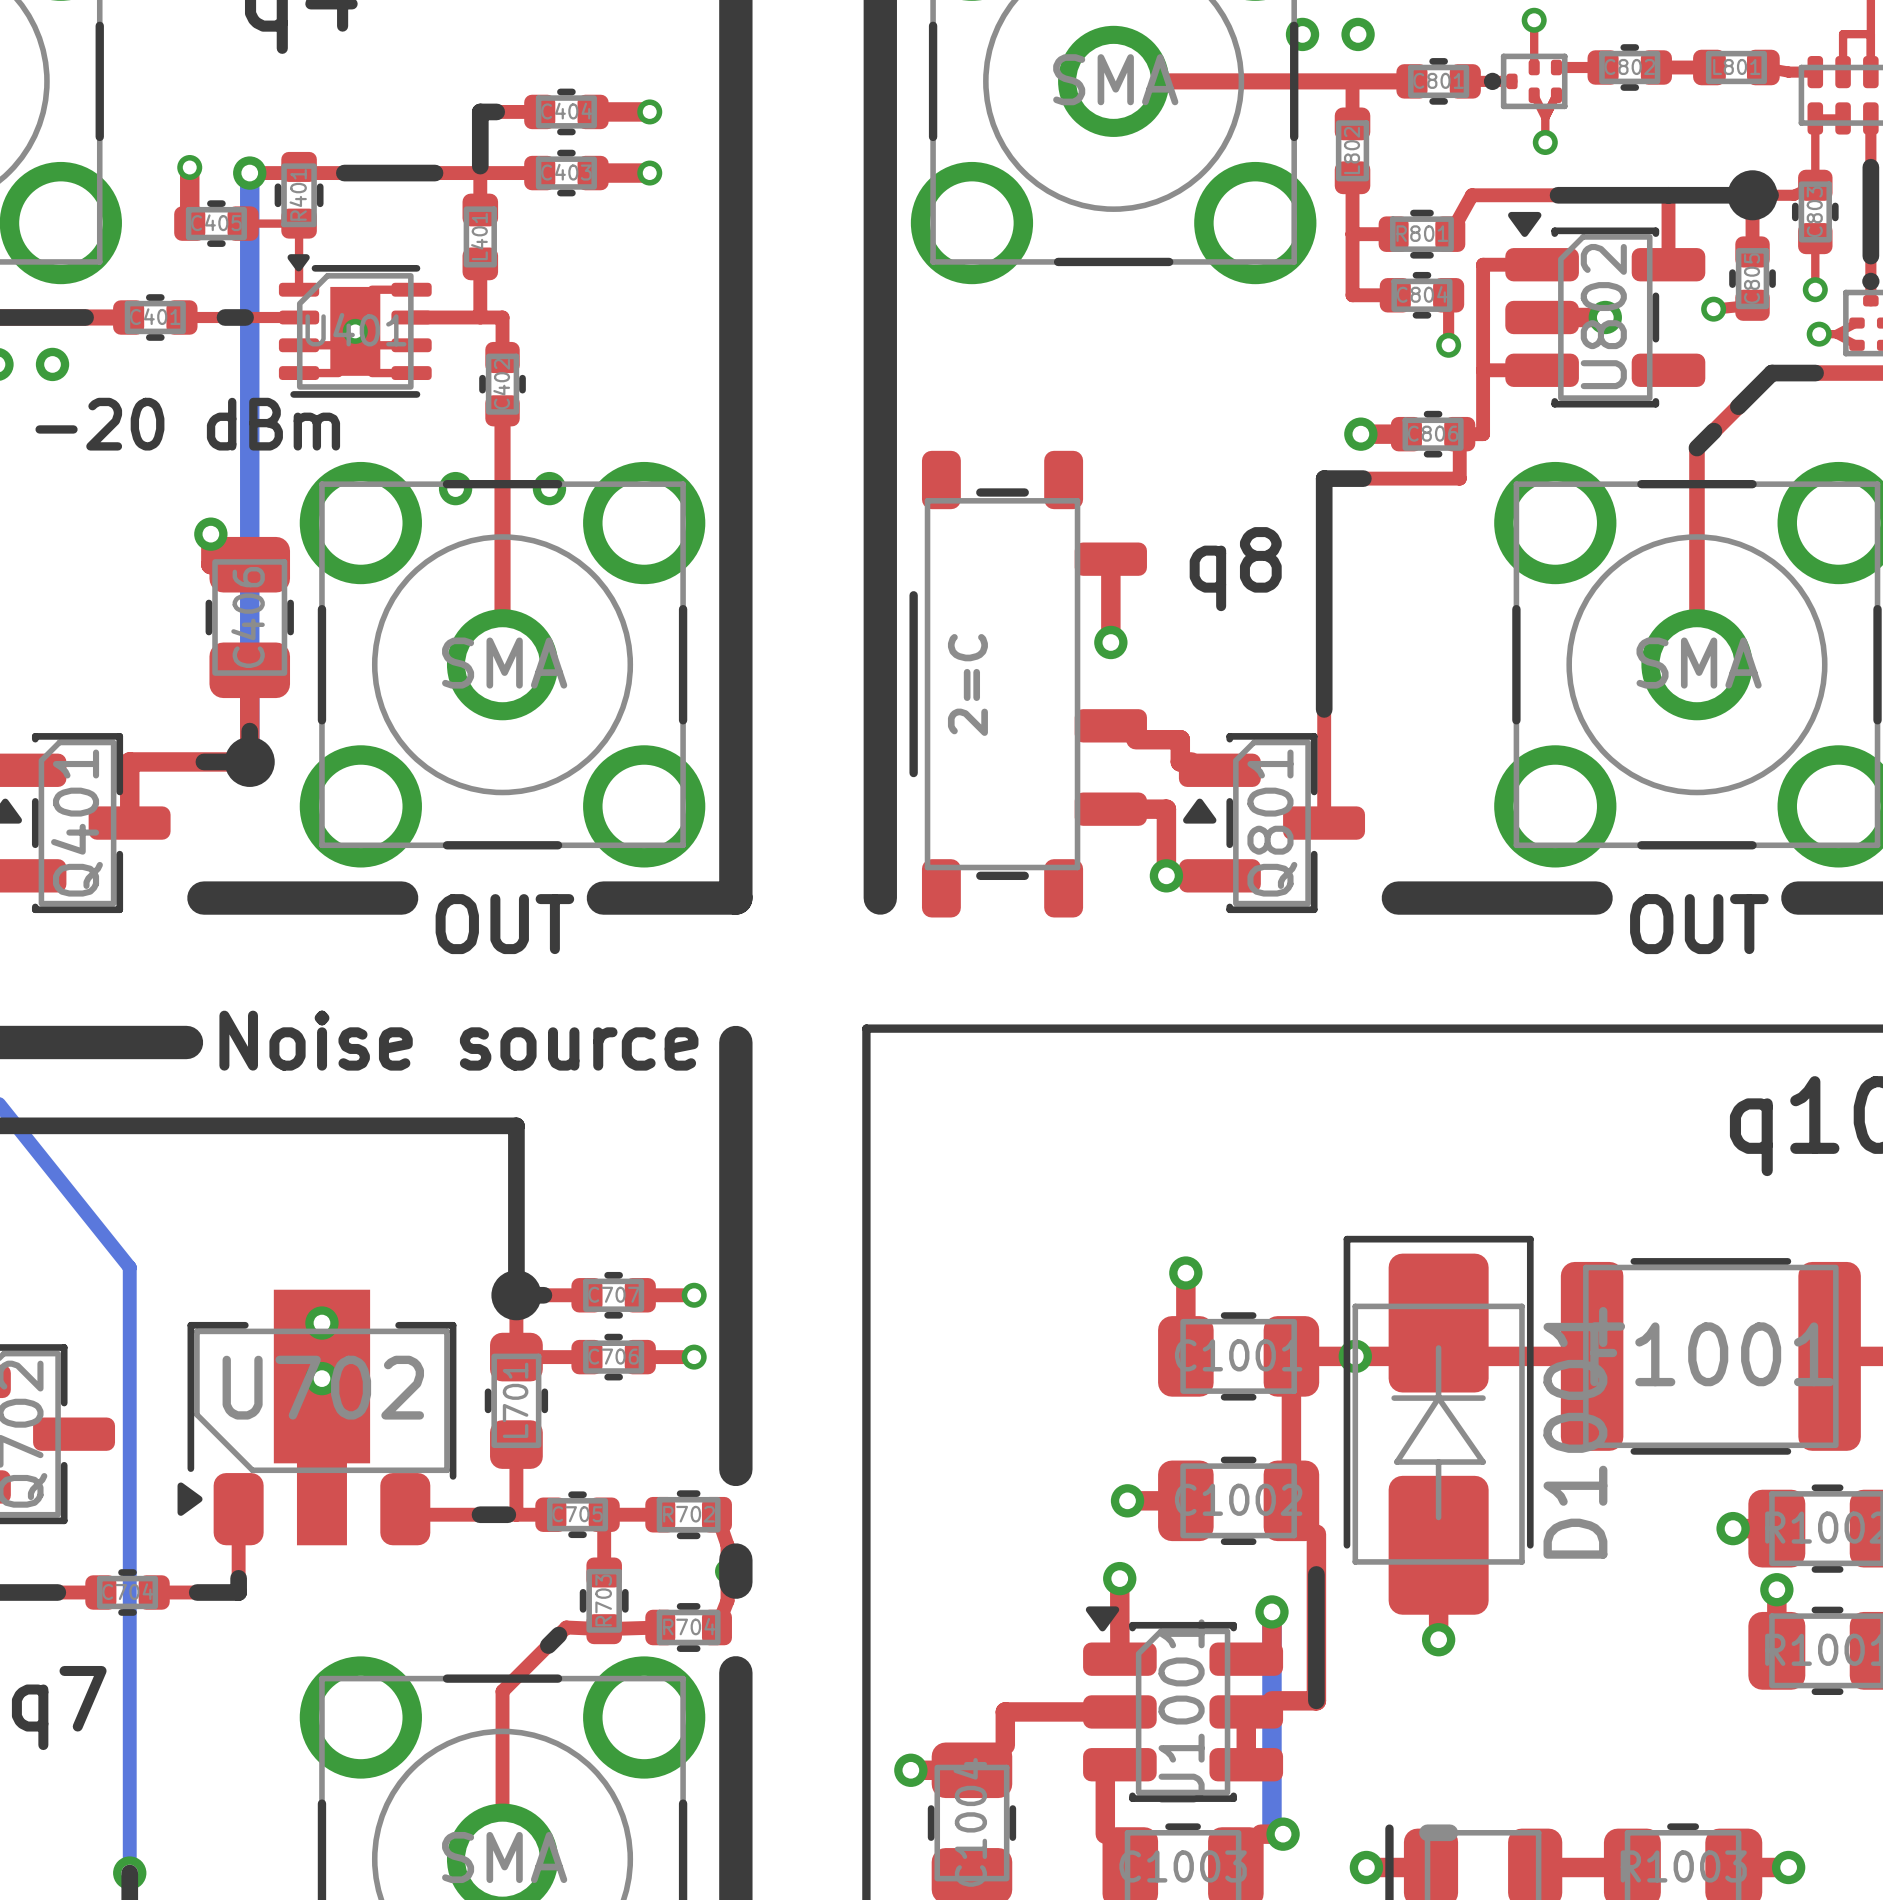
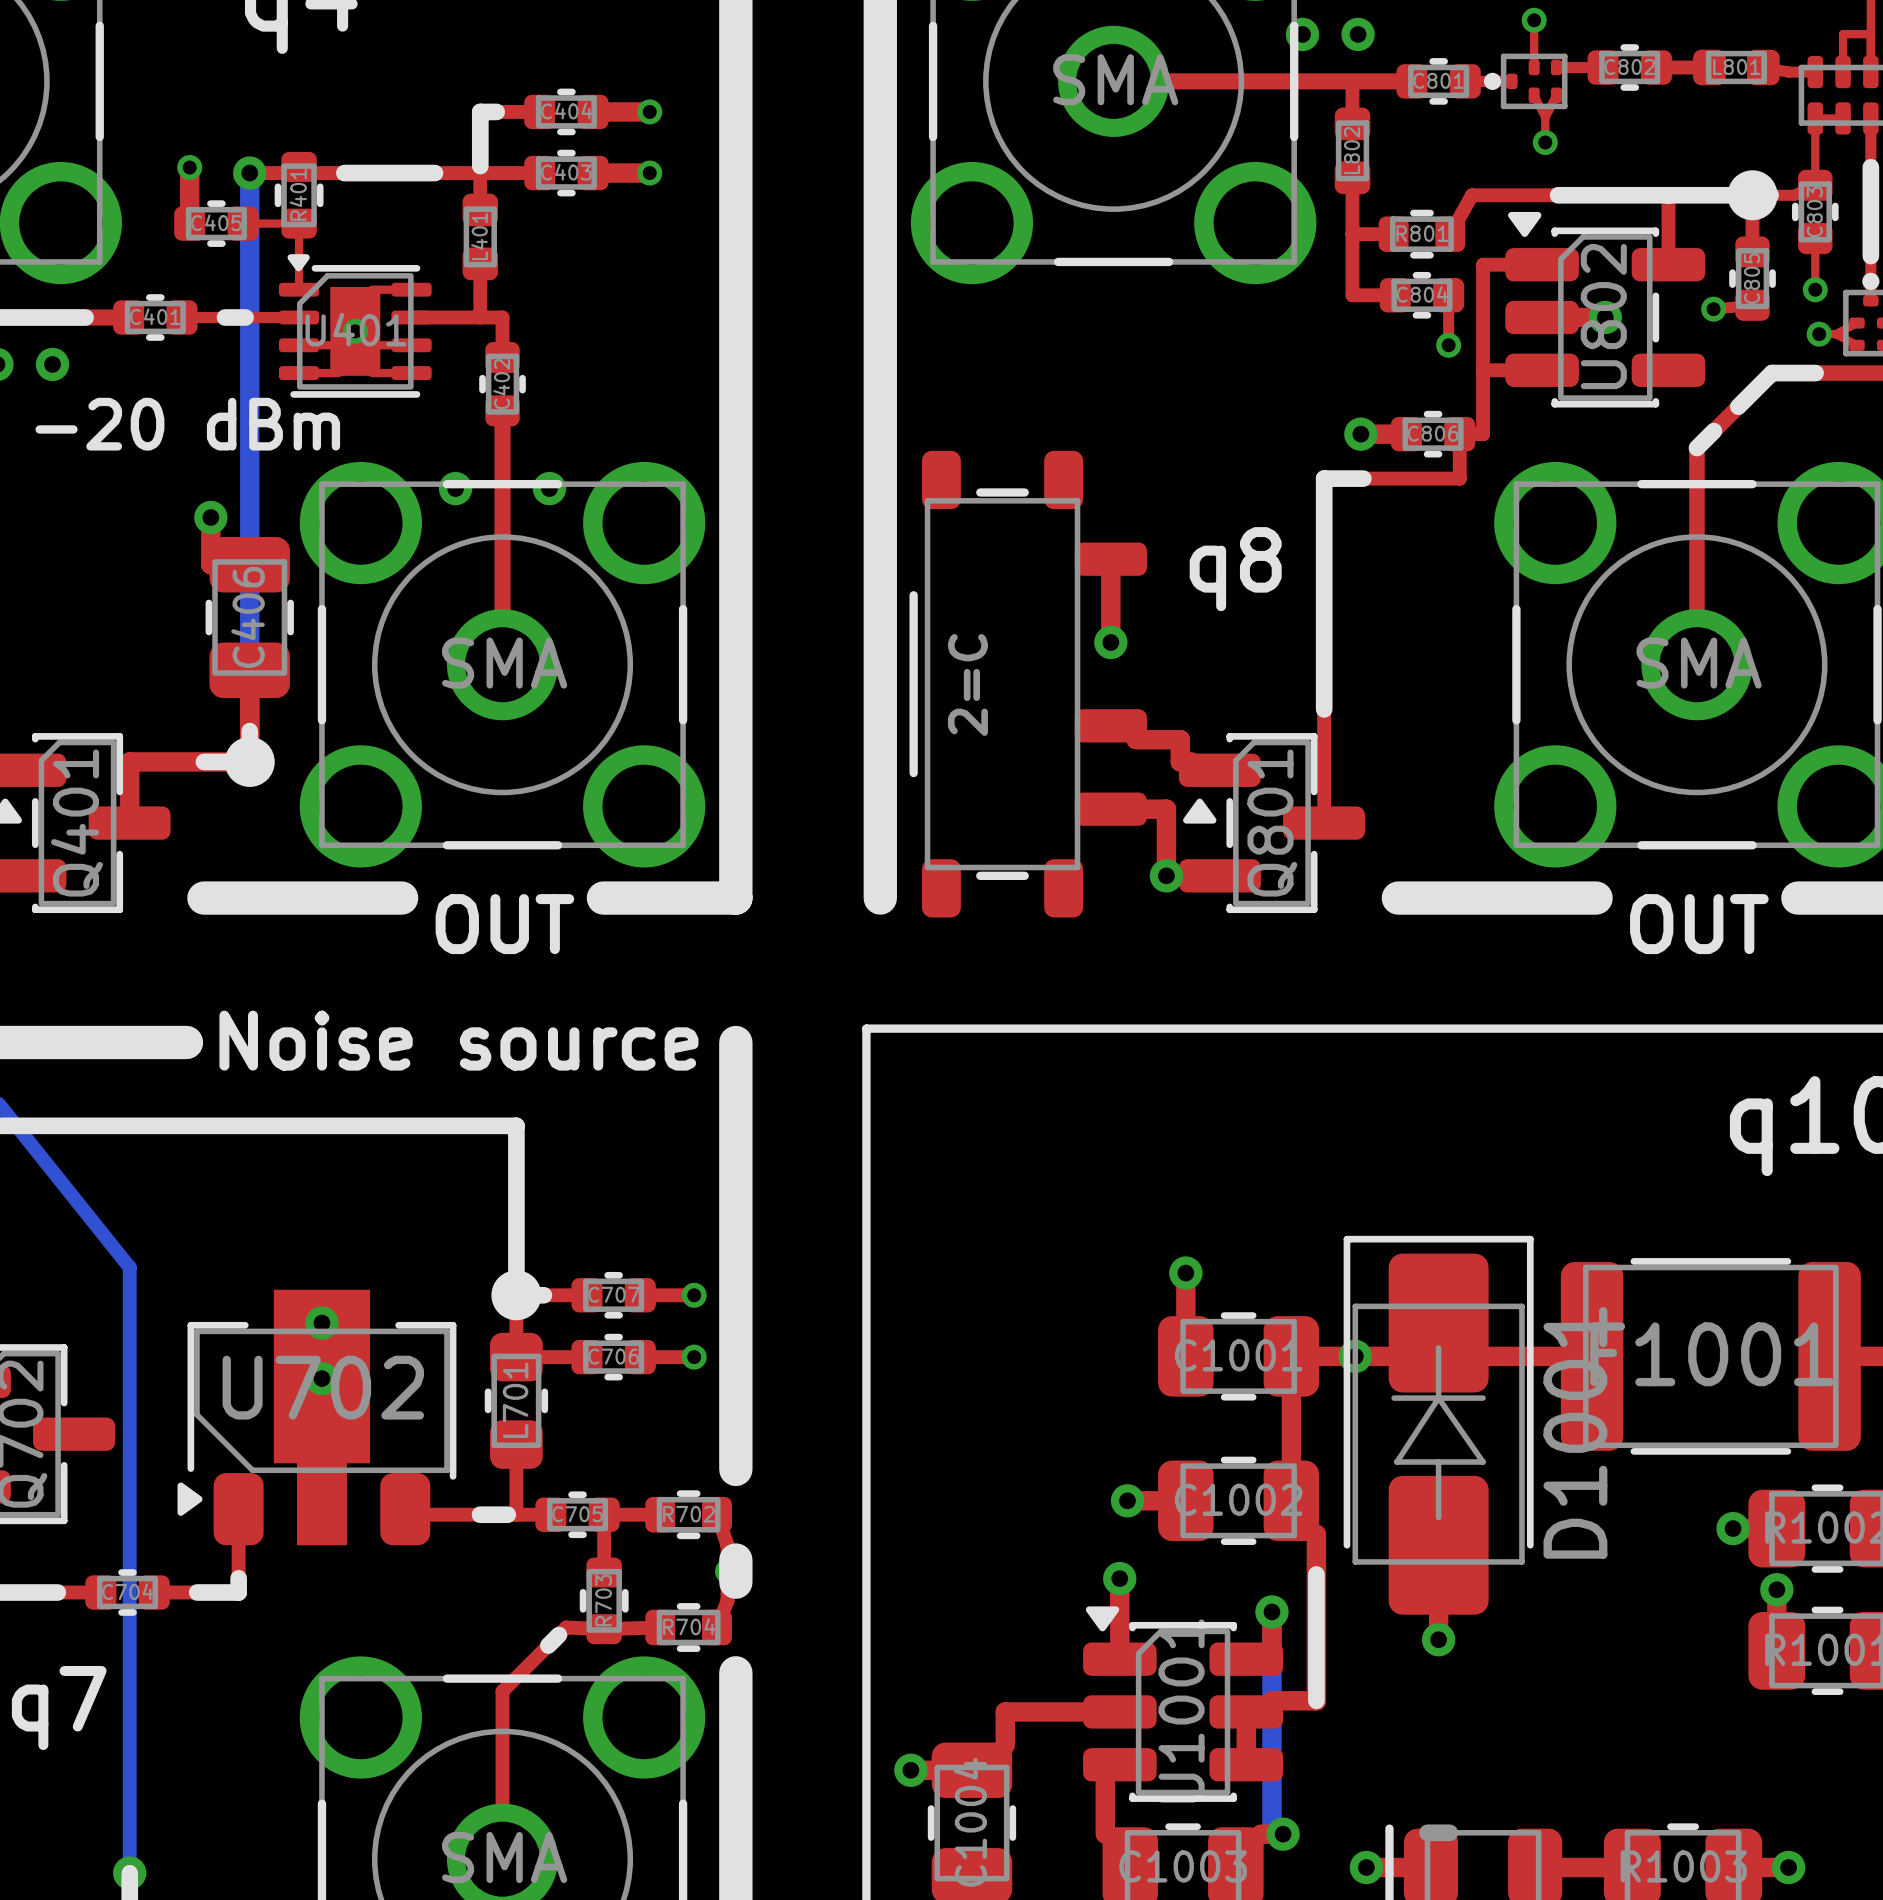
via position: (210, 534) -> (210, 517)

